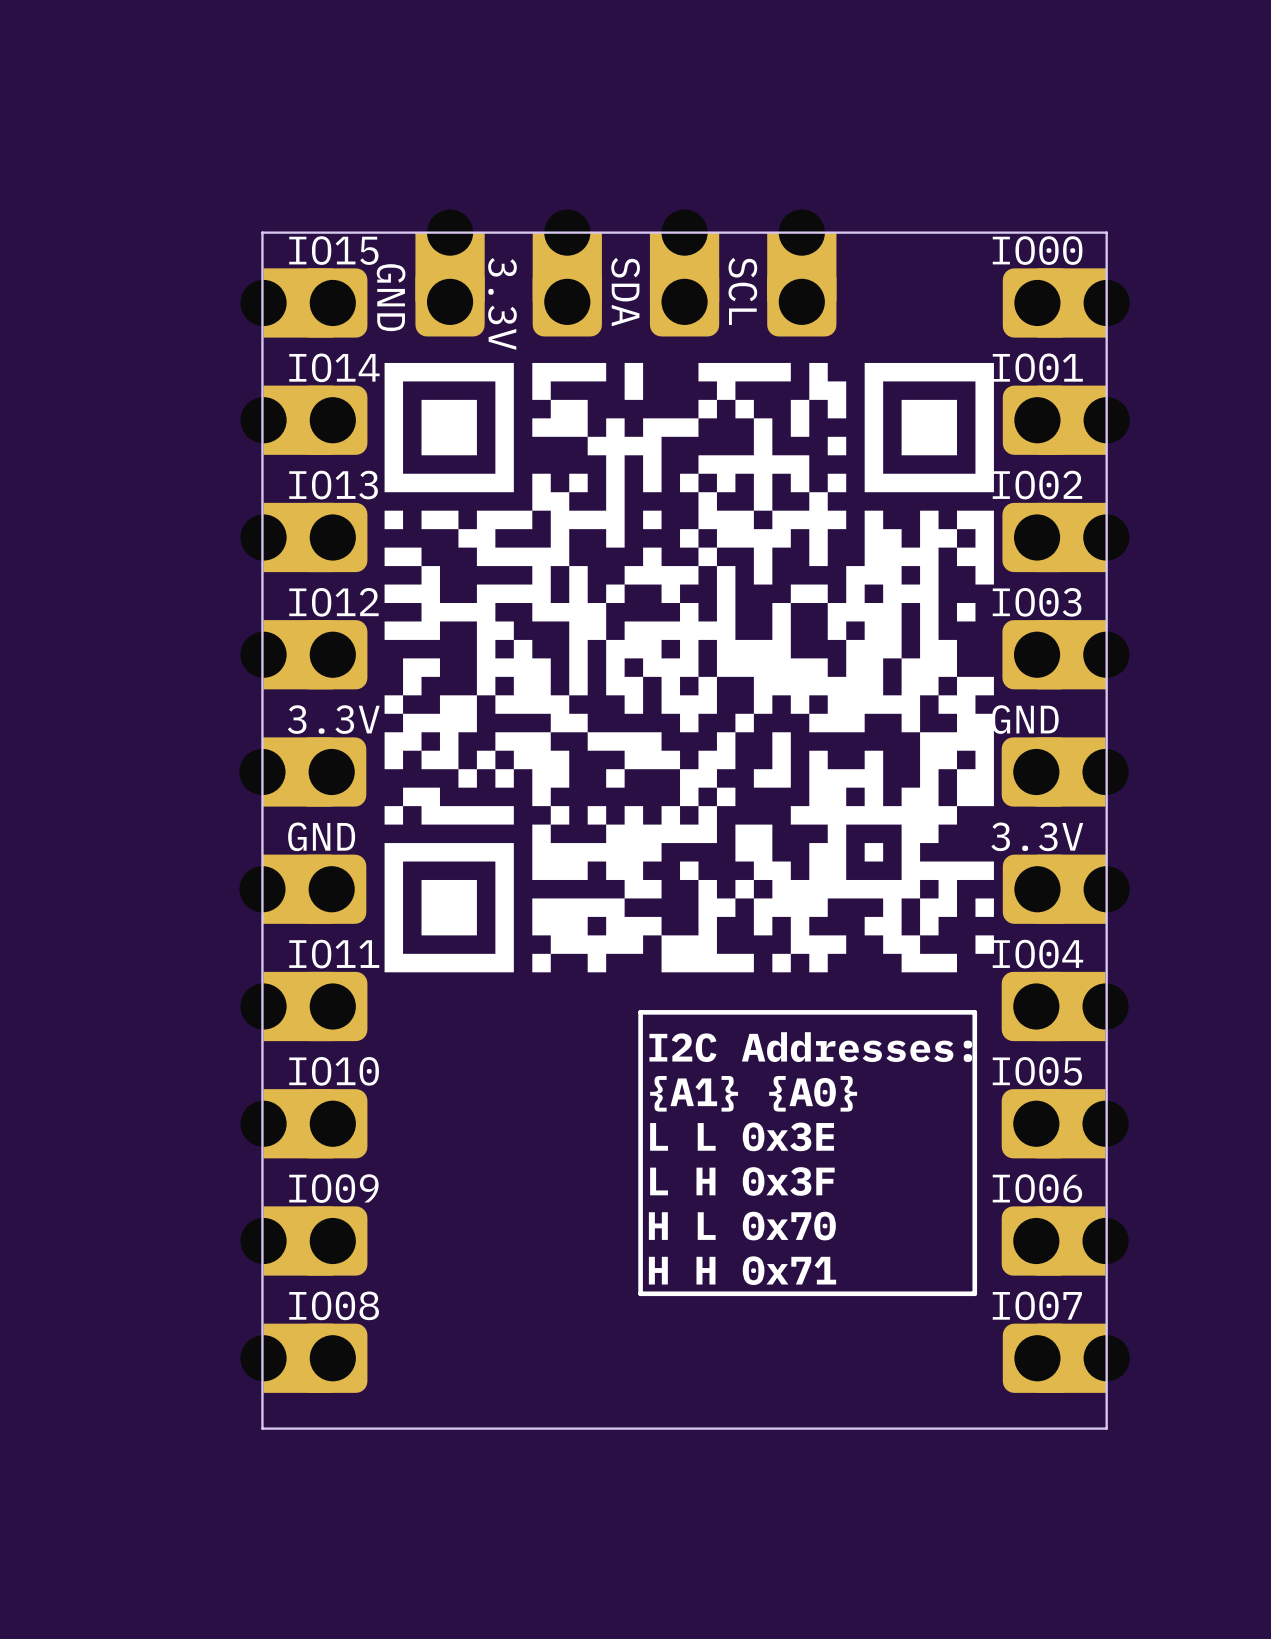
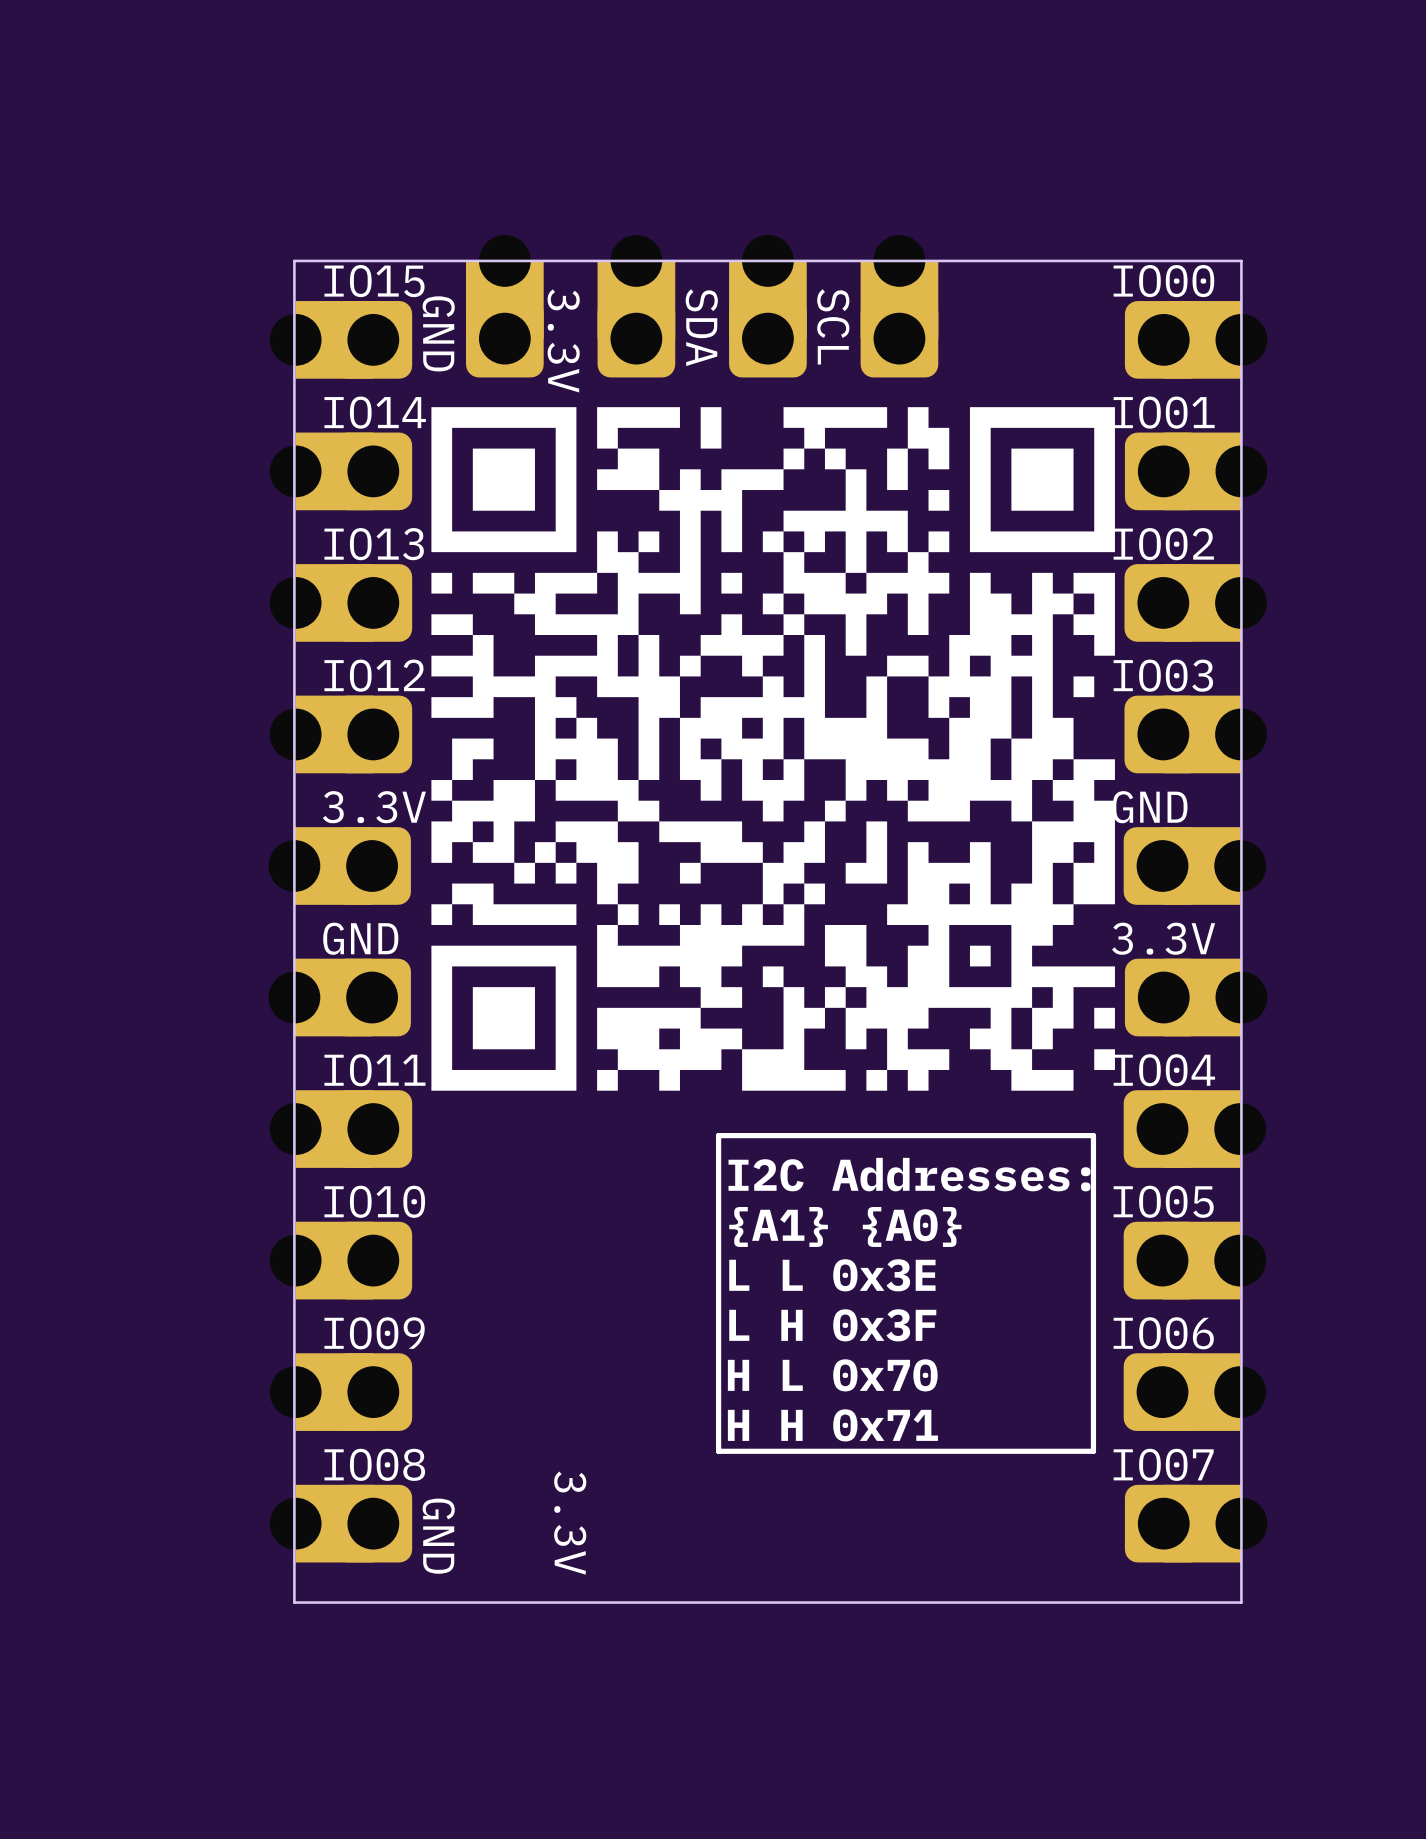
text: none -> 3.3V (570, 1523)
text: none -> GND (438, 1536)

